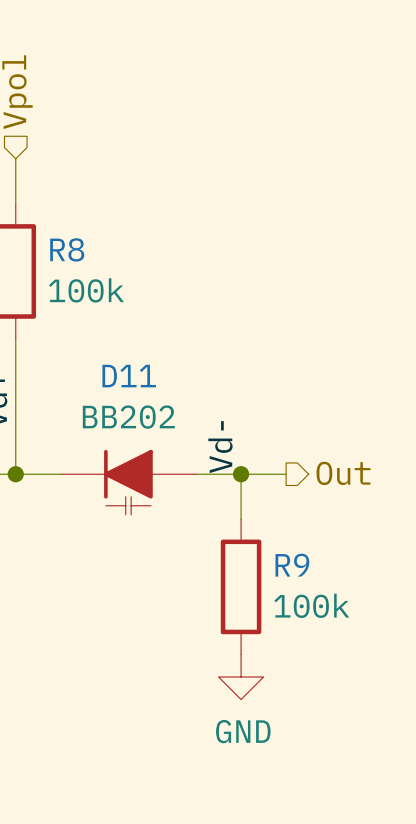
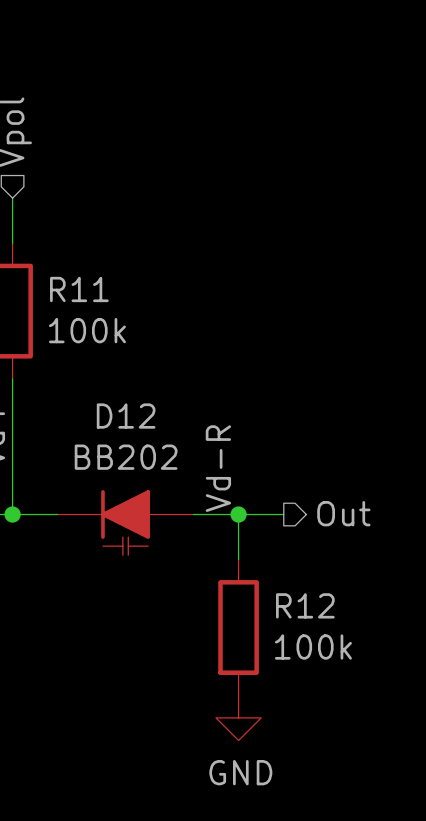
R8 name: R8 (67, 249) -> R11 (79, 289)
D11 name: D11 (129, 376) -> D12 (126, 416)
label: Vd- (220, 447) -> Vd-R (218, 468)
R9 name: R9 (292, 565) -> R12 (305, 605)

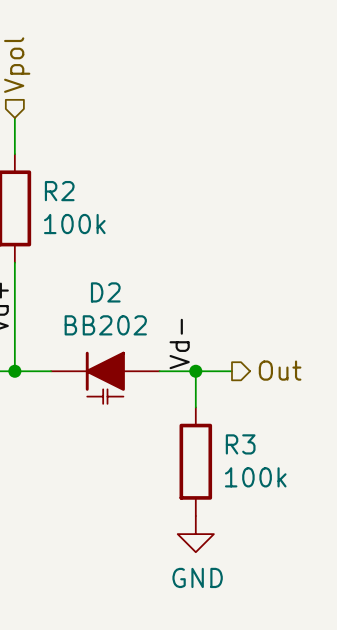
R11 name: R11 (79, 289) -> R2 (59, 191)
D12 name: D12 (126, 416) -> D2 (105, 292)
label: Vd-R (218, 468) -> Vd- (179, 343)
R12 name: R12 (305, 605) -> R3 (240, 444)

